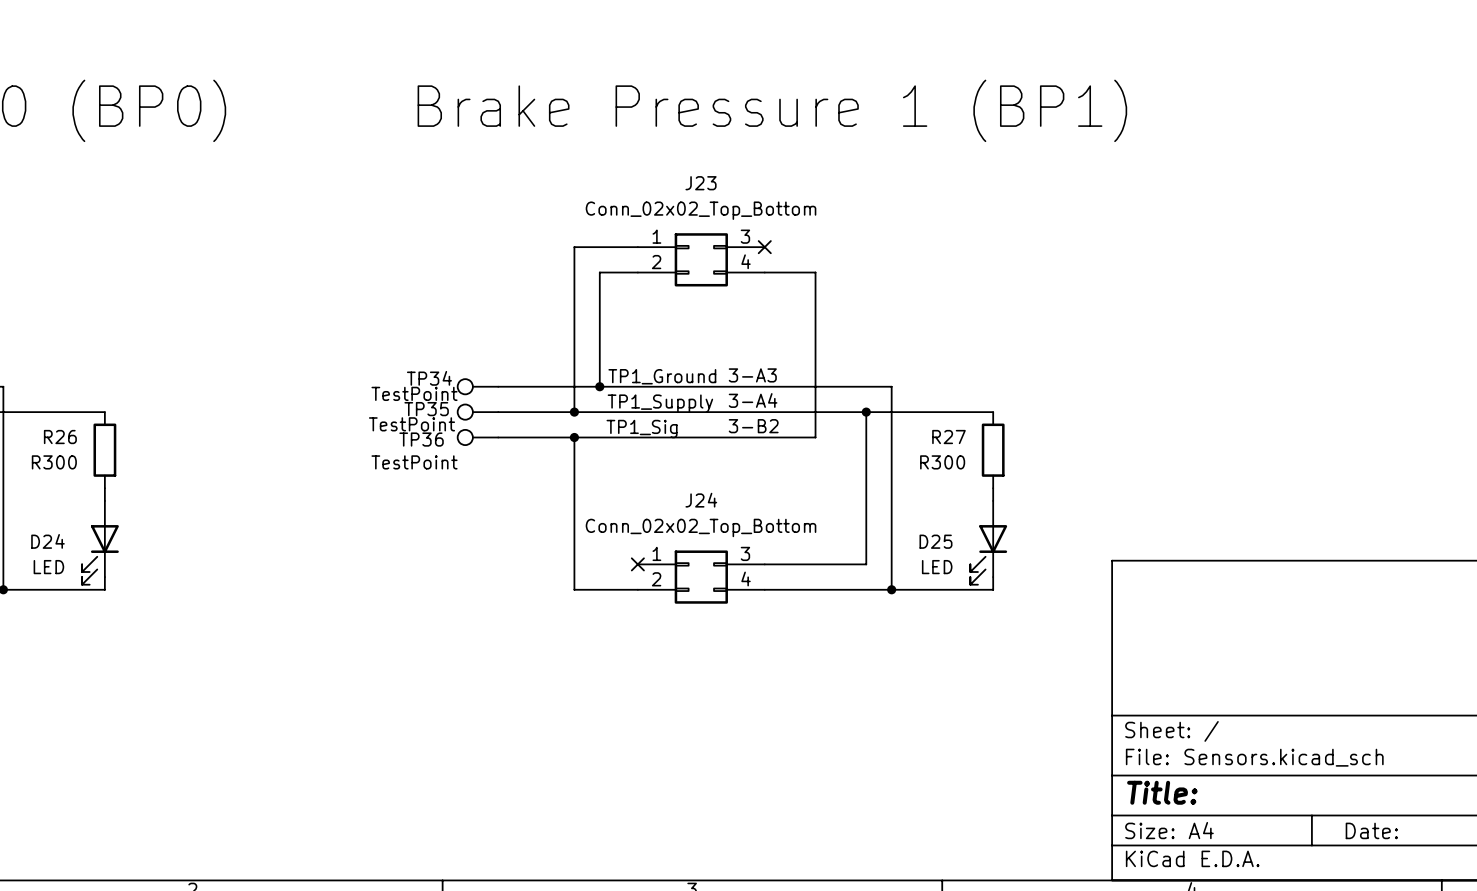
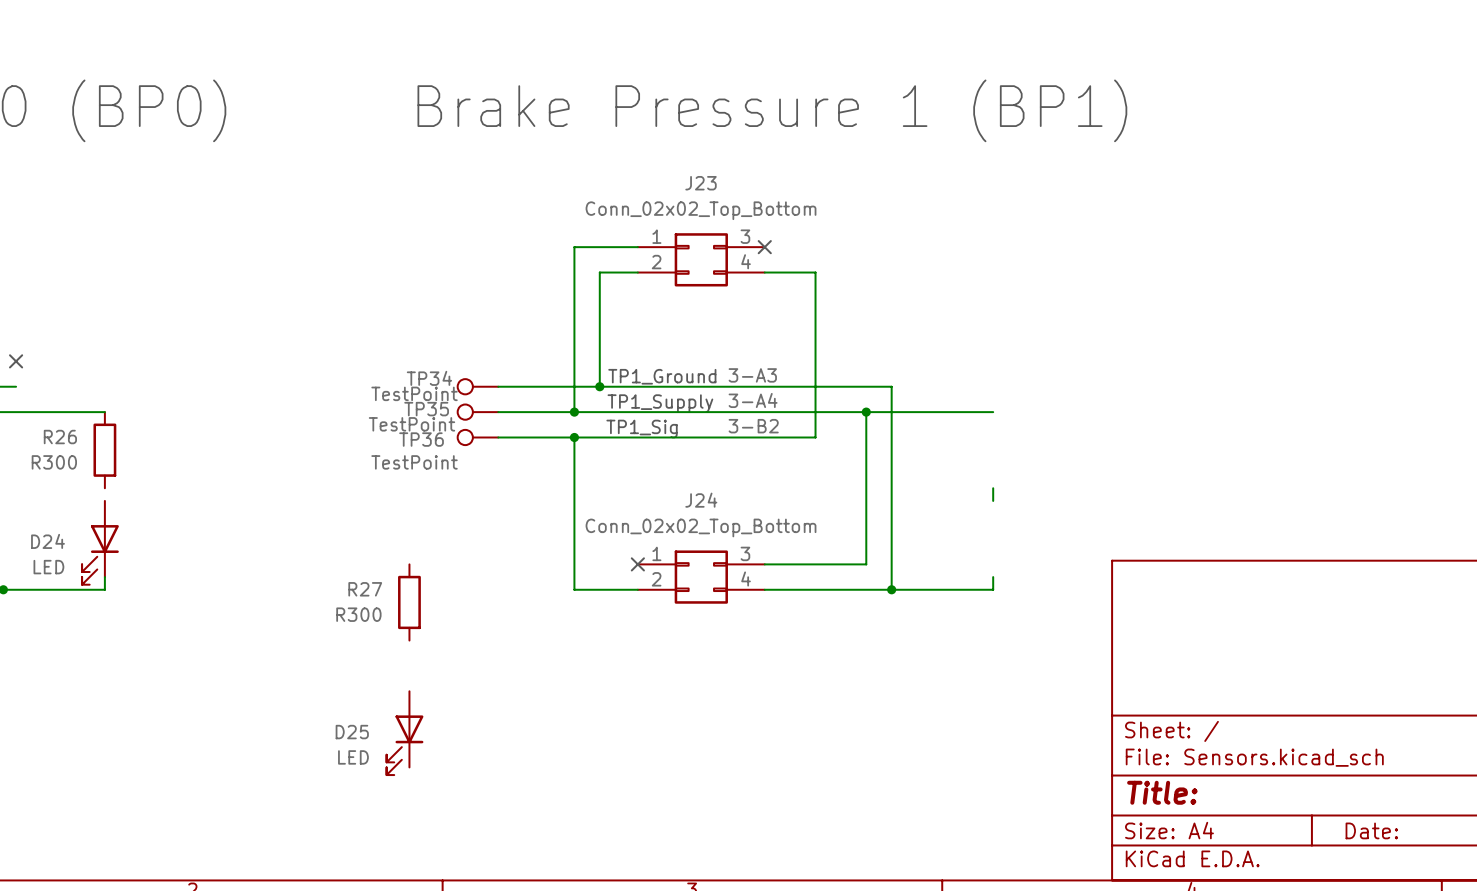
no-connect mark: none -> (16, 361)
wire: (3, 386) (3, 589) -> (3, 386) (16, 386)
R27 position: (993, 450) -> (409, 602)
wire: (104, 488) (104, 500) -> none
D25 position: (988, 542) -> (405, 733)

